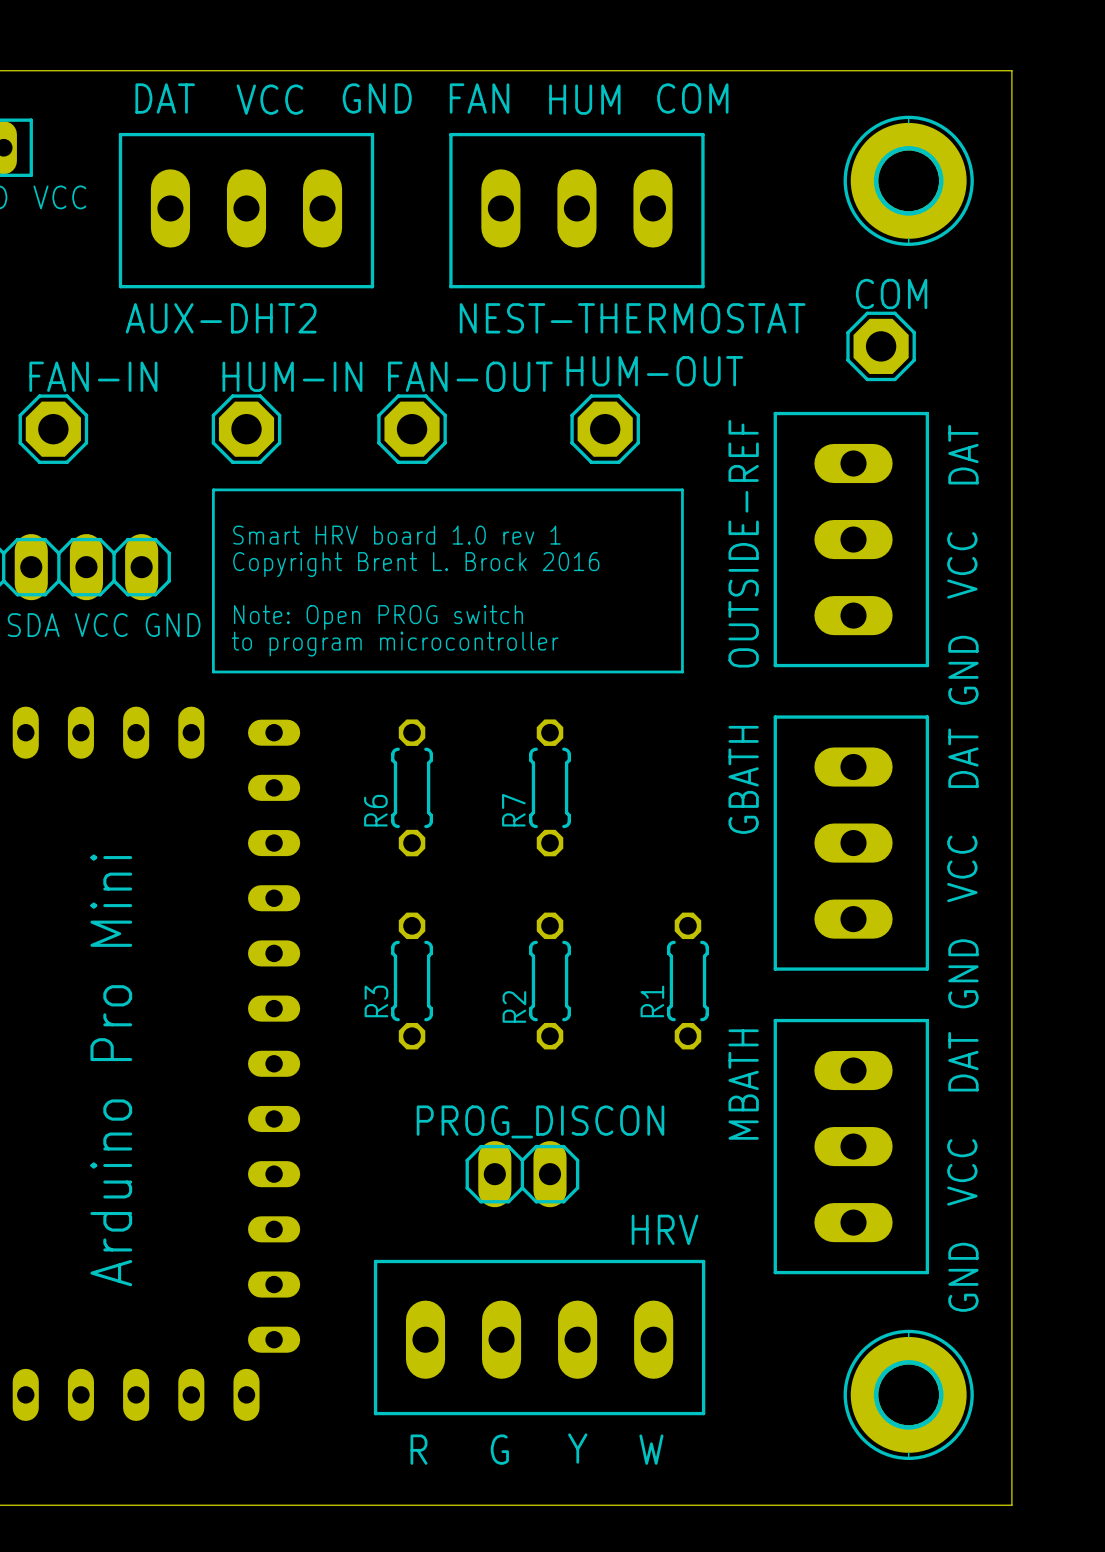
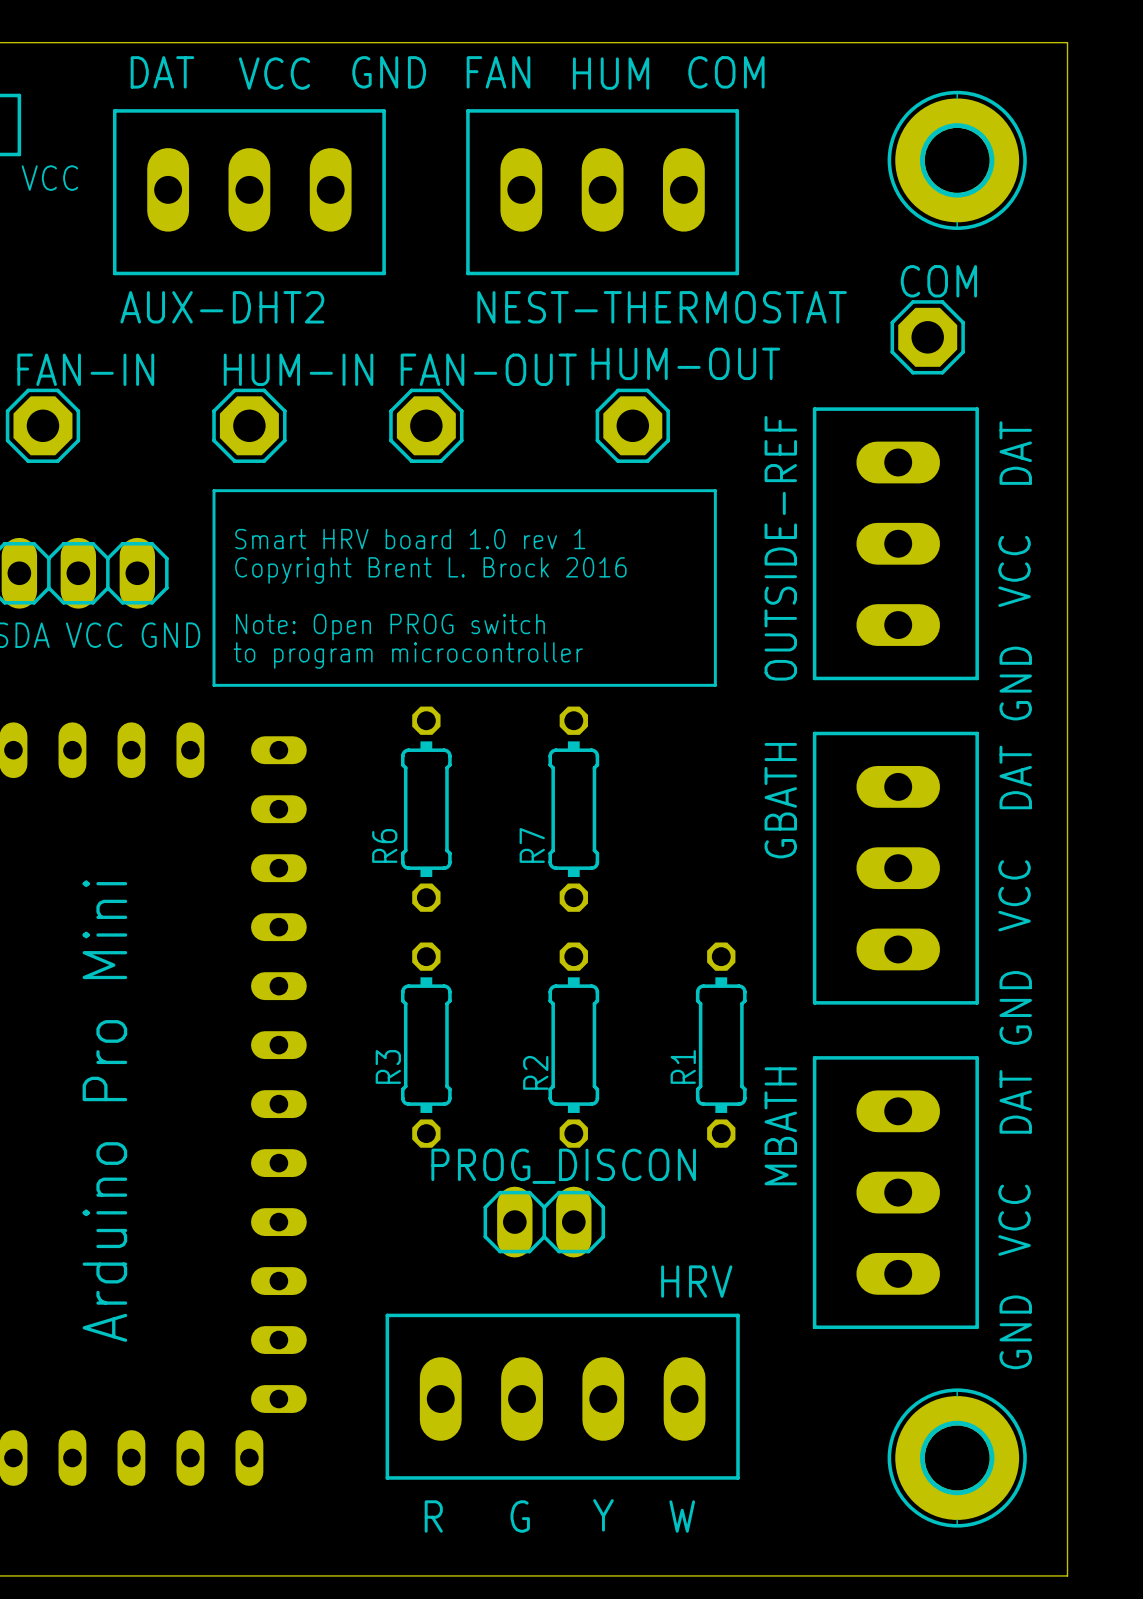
R6 footprint: [391, 719, 434, 857] -> [400, 706, 452, 912]
R7 footprint: [529, 719, 571, 857] -> [548, 706, 600, 912]
R3 footprint: [391, 912, 434, 1050] -> [400, 942, 452, 1148]
R2 footprint: [529, 912, 571, 1050] -> [548, 942, 600, 1148]
R1 footprint: [666, 912, 709, 1050] -> [695, 942, 747, 1148]

